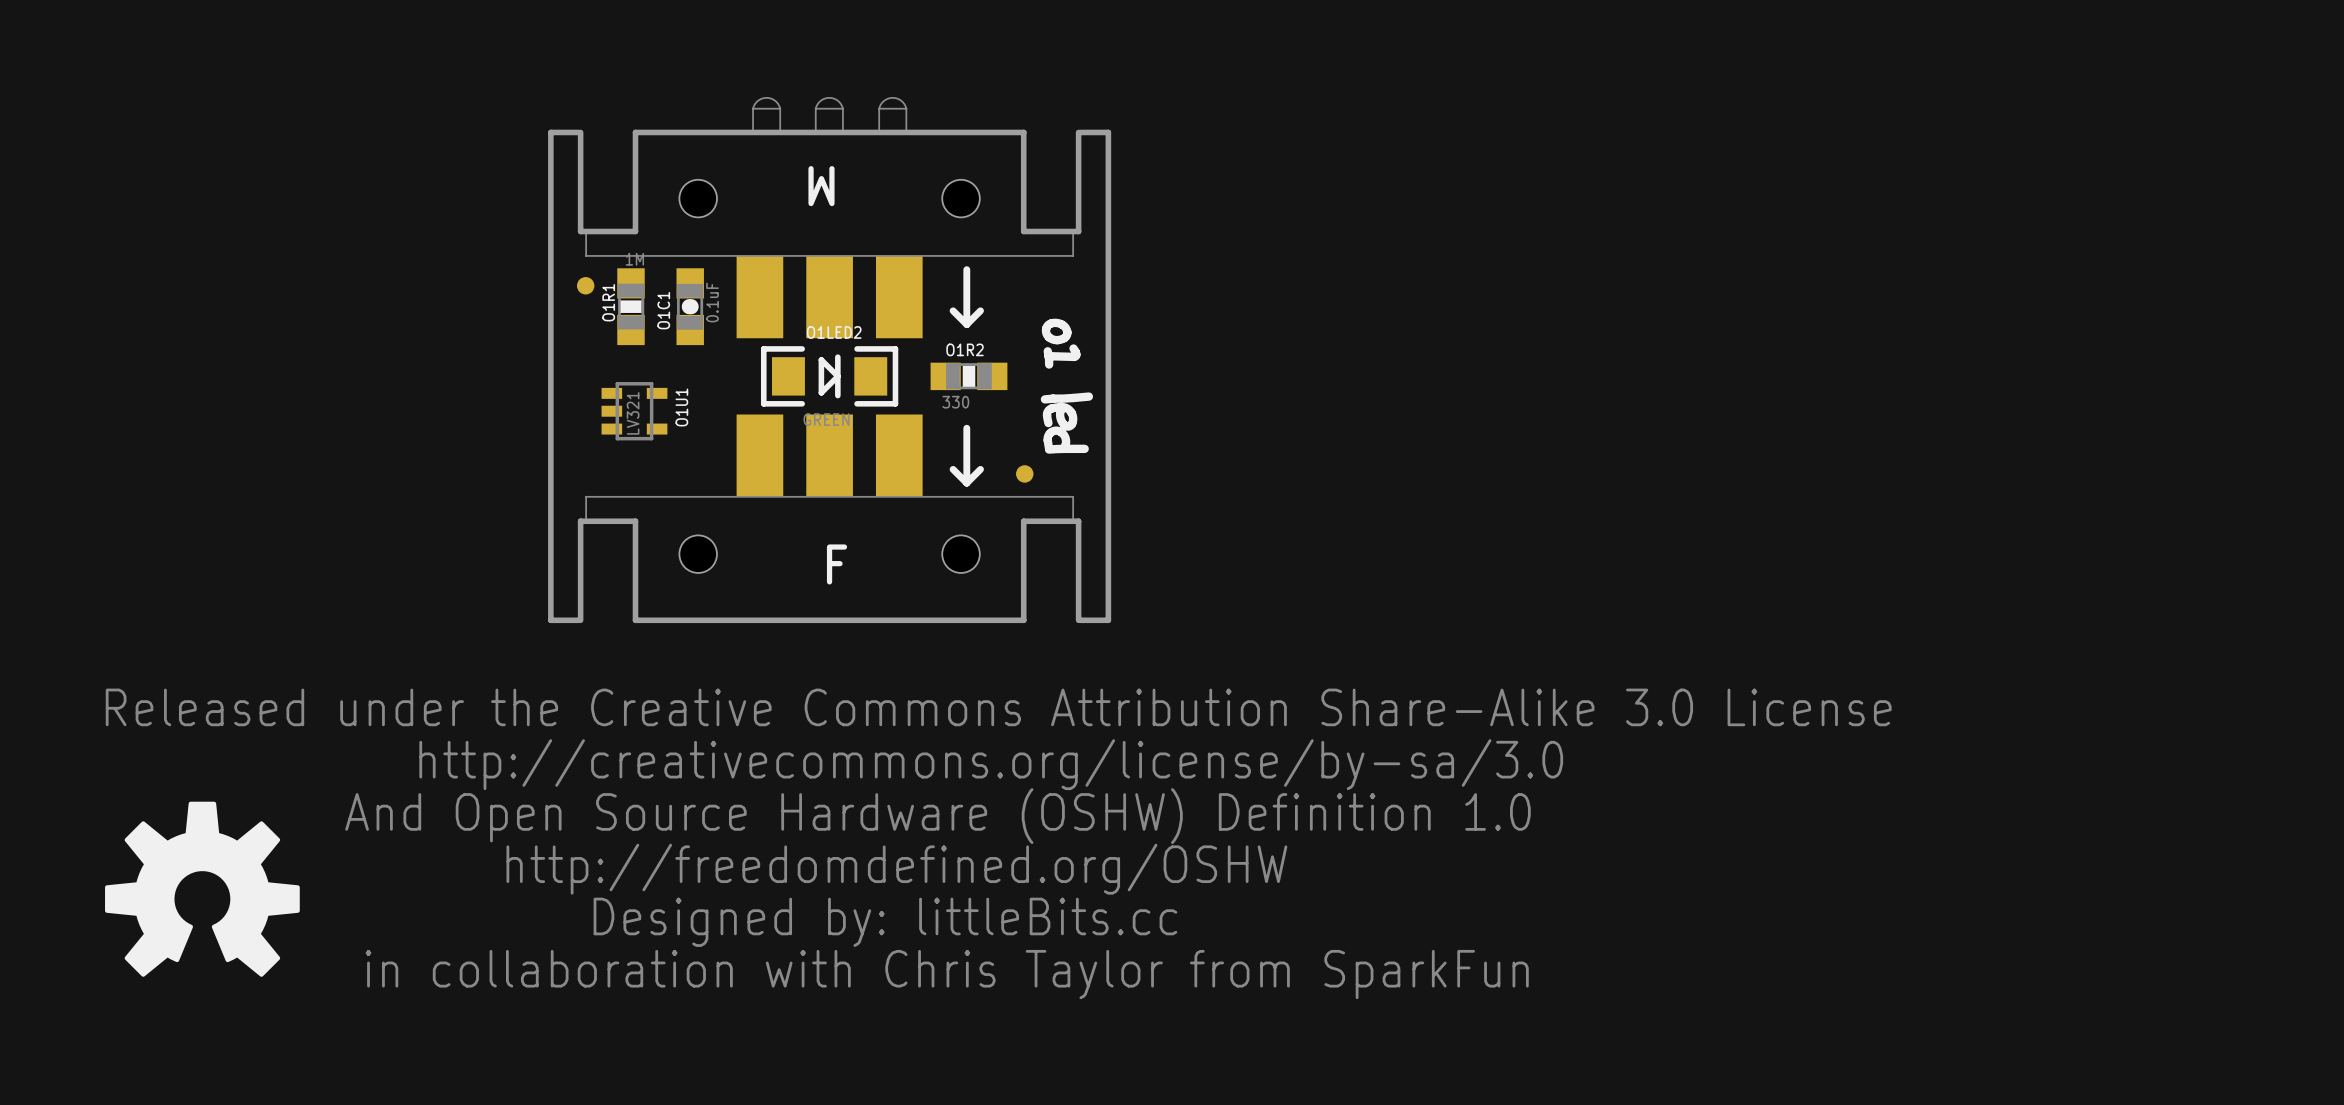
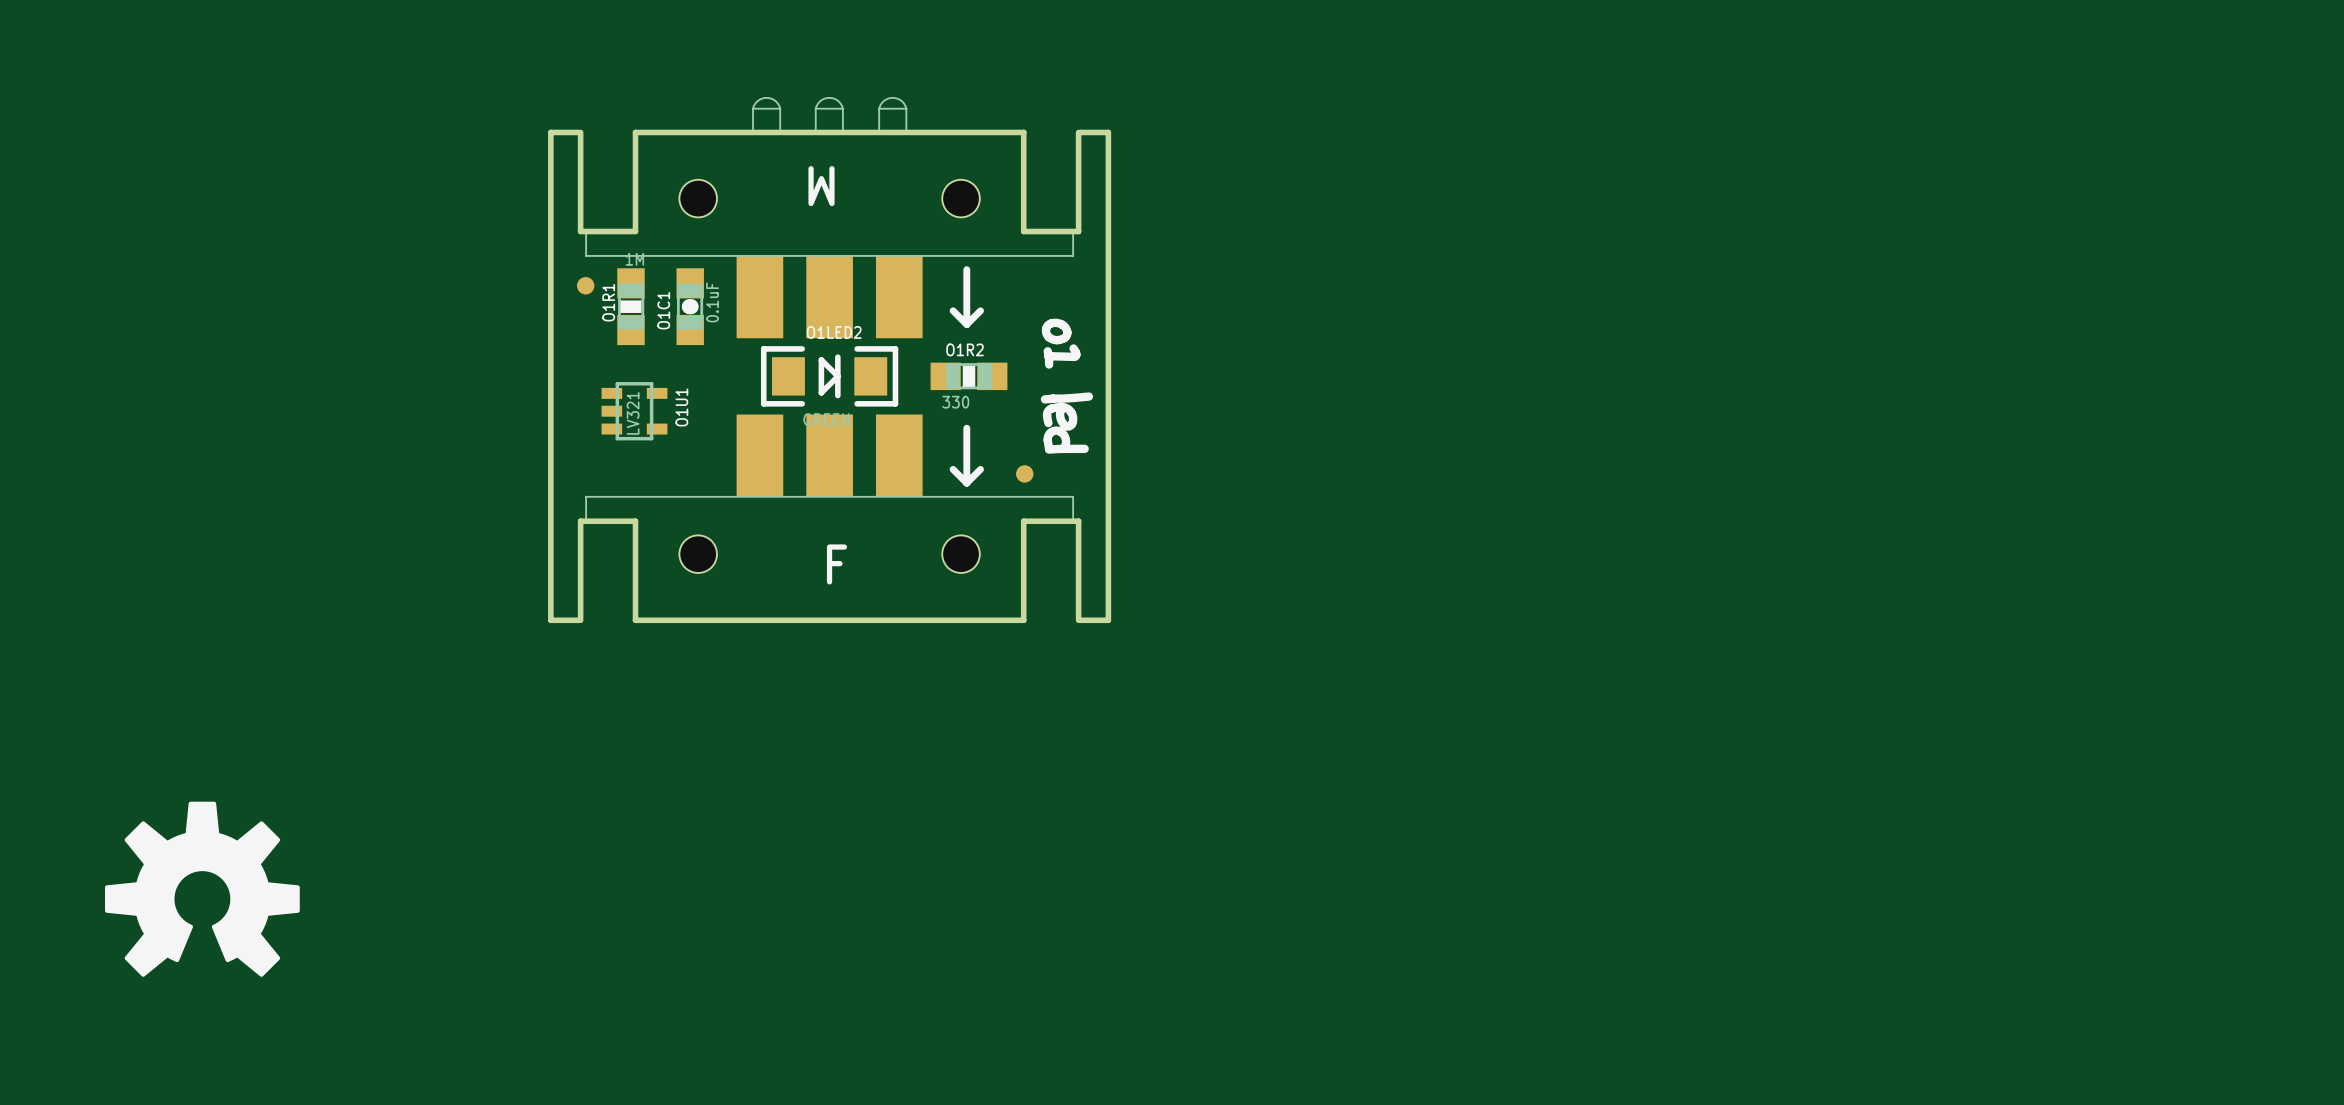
drawing: [105, 688, 1892, 1000] -> none

